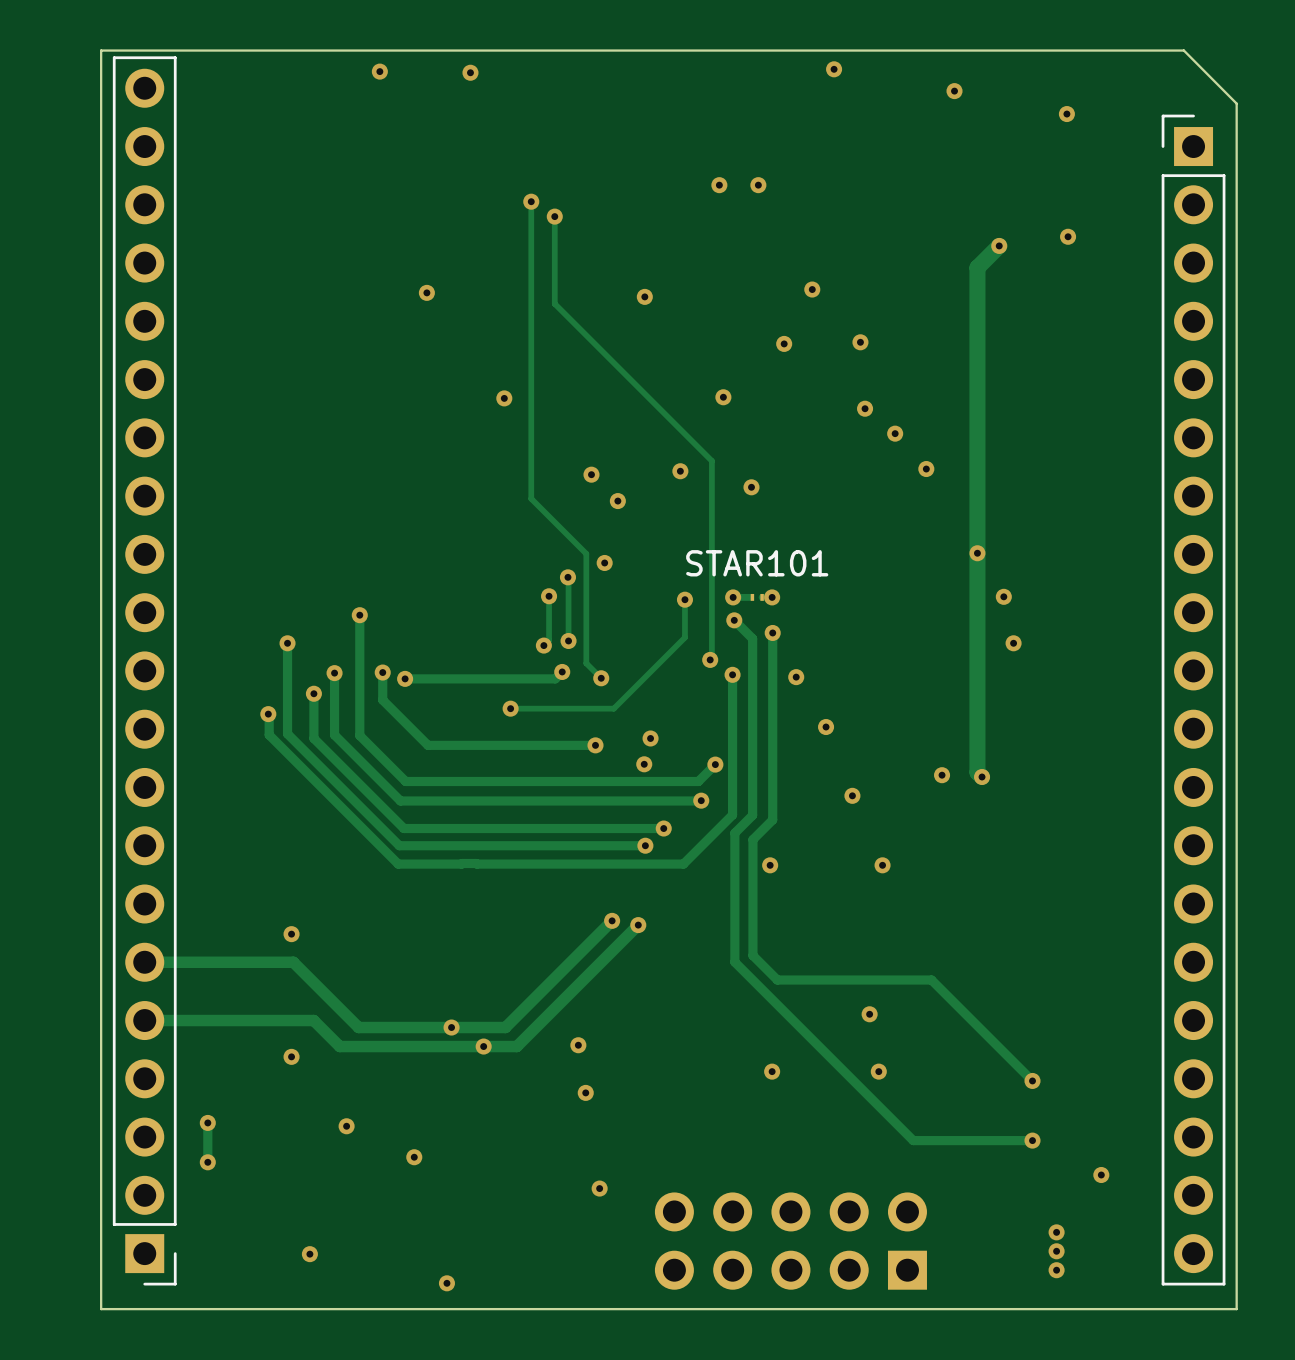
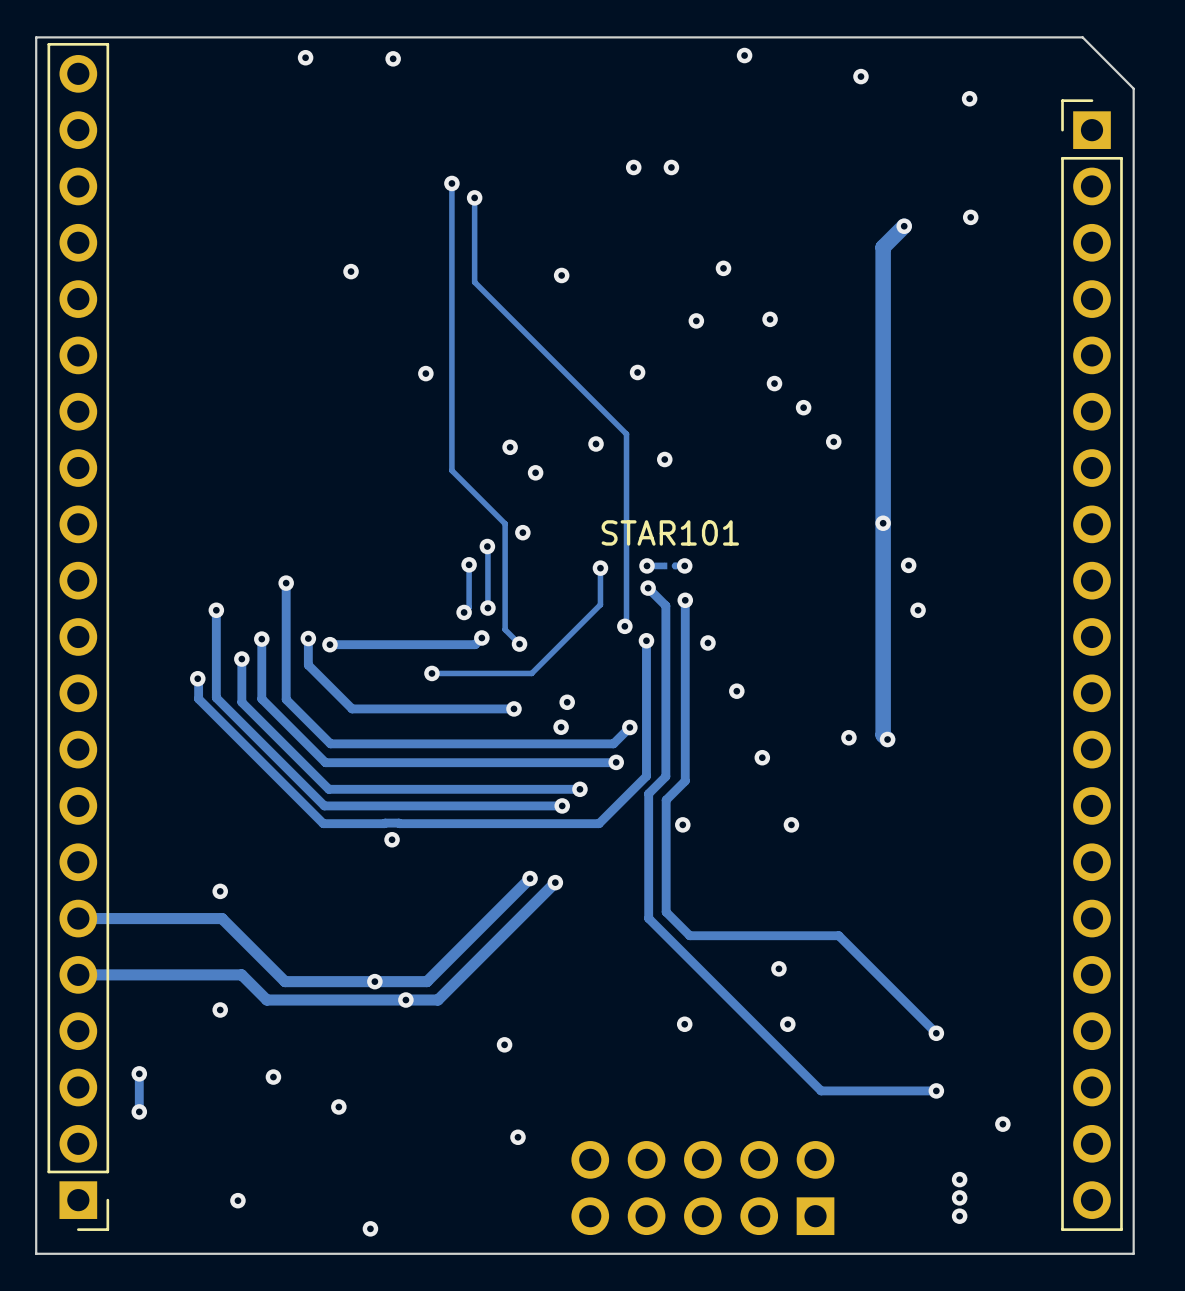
via: none -> (392, 839)
via: (578, 1045) -> none

